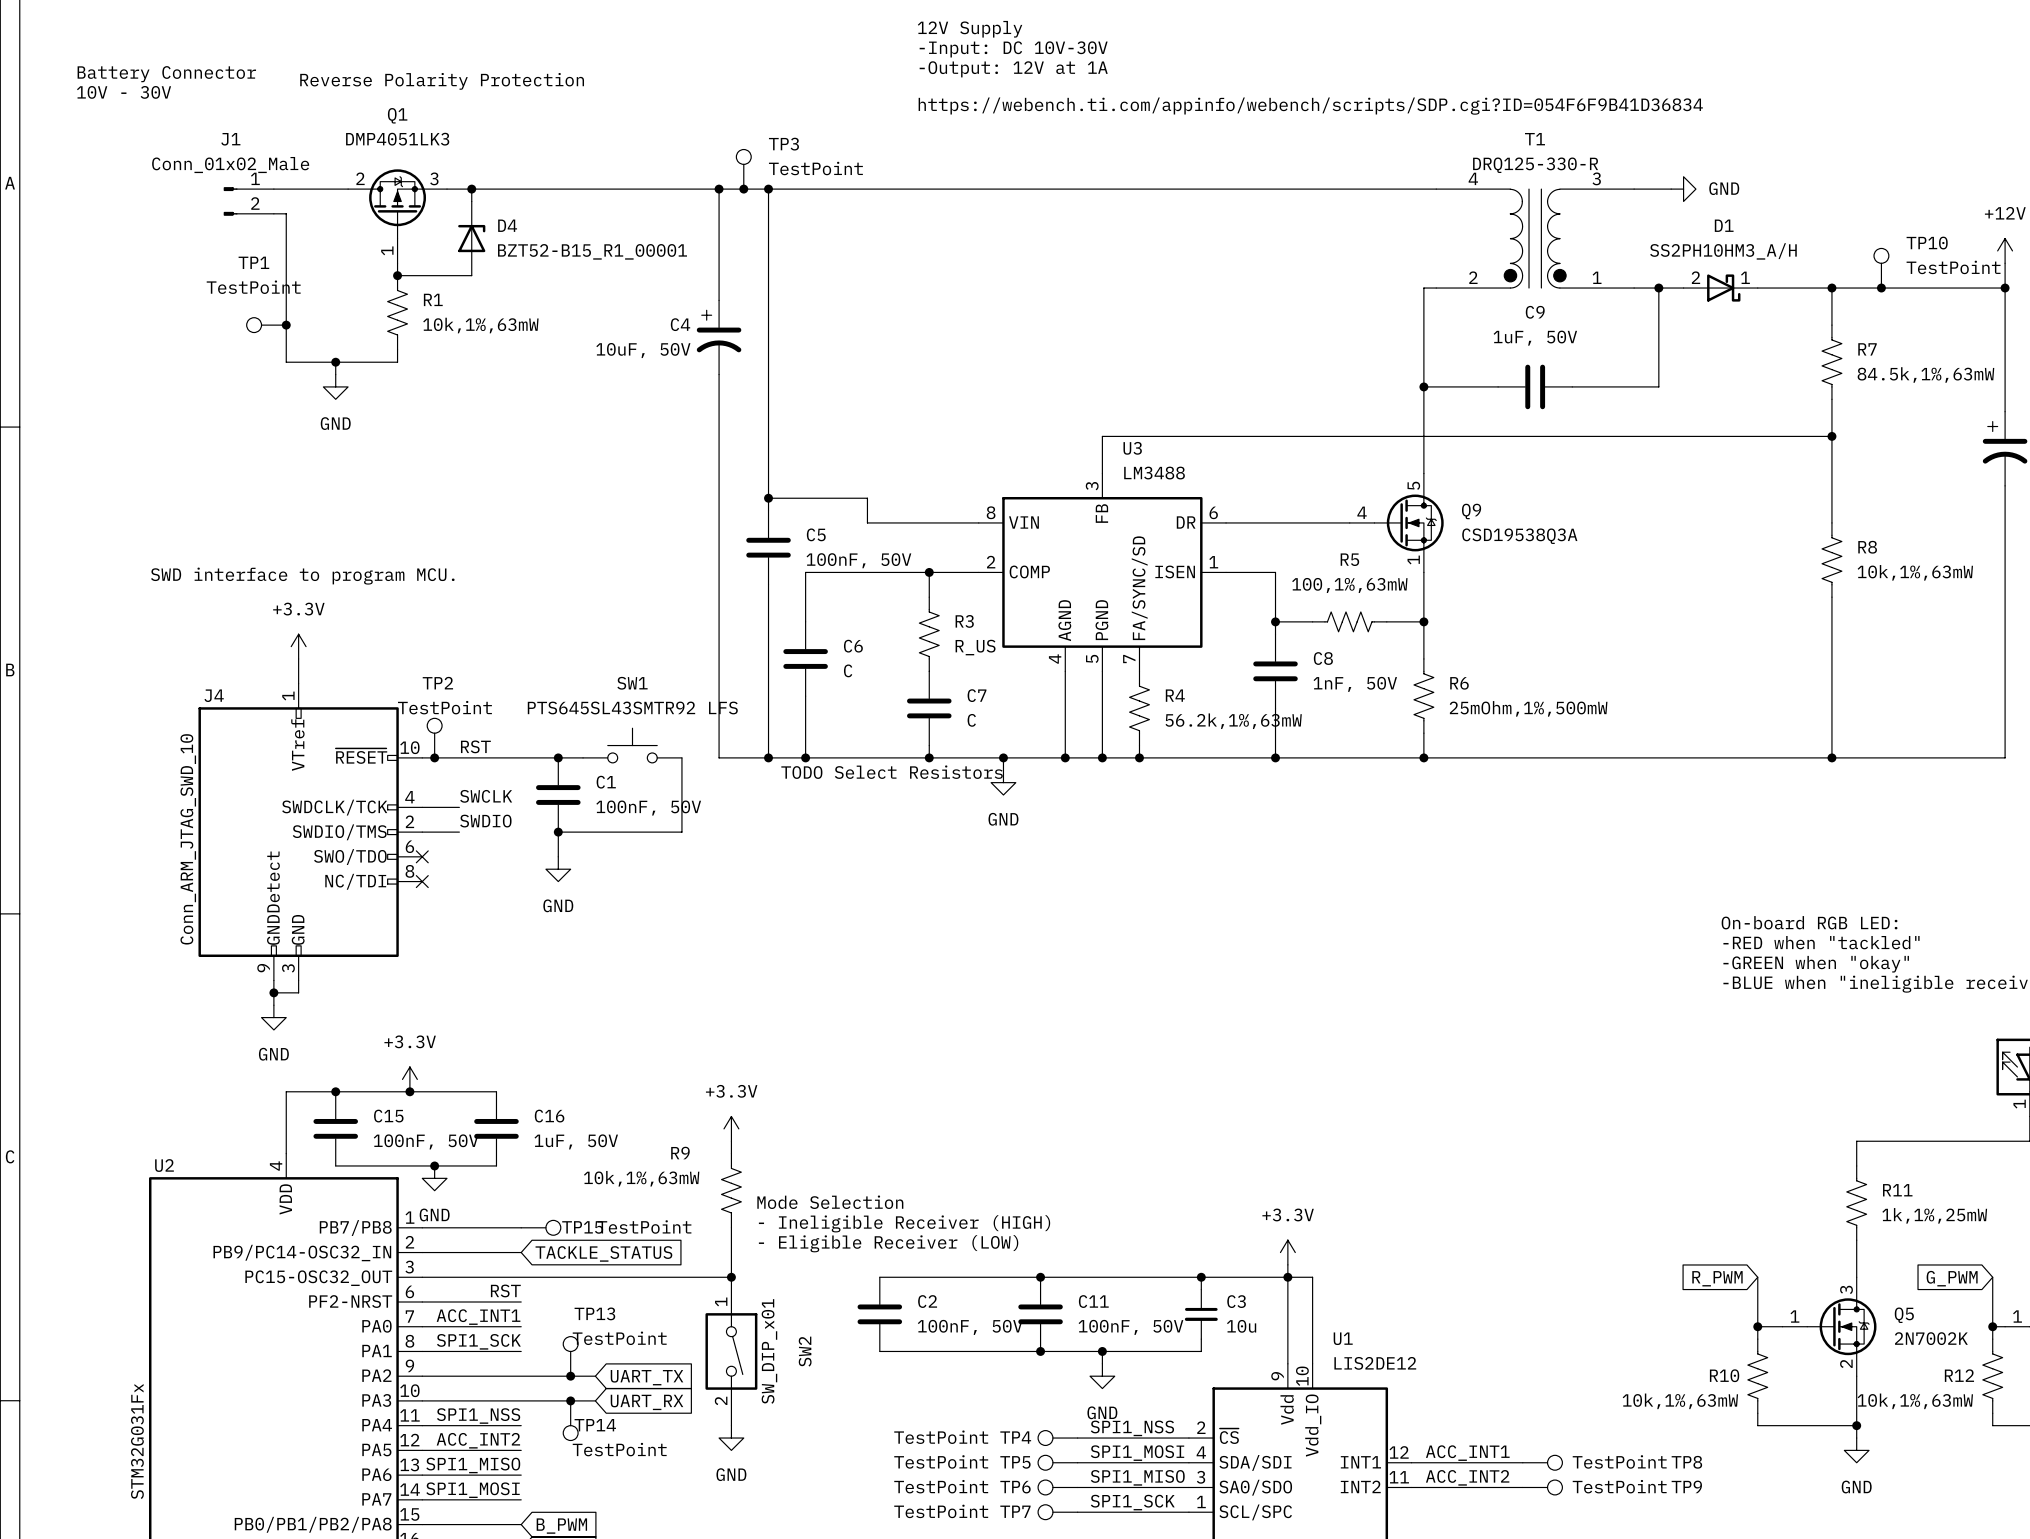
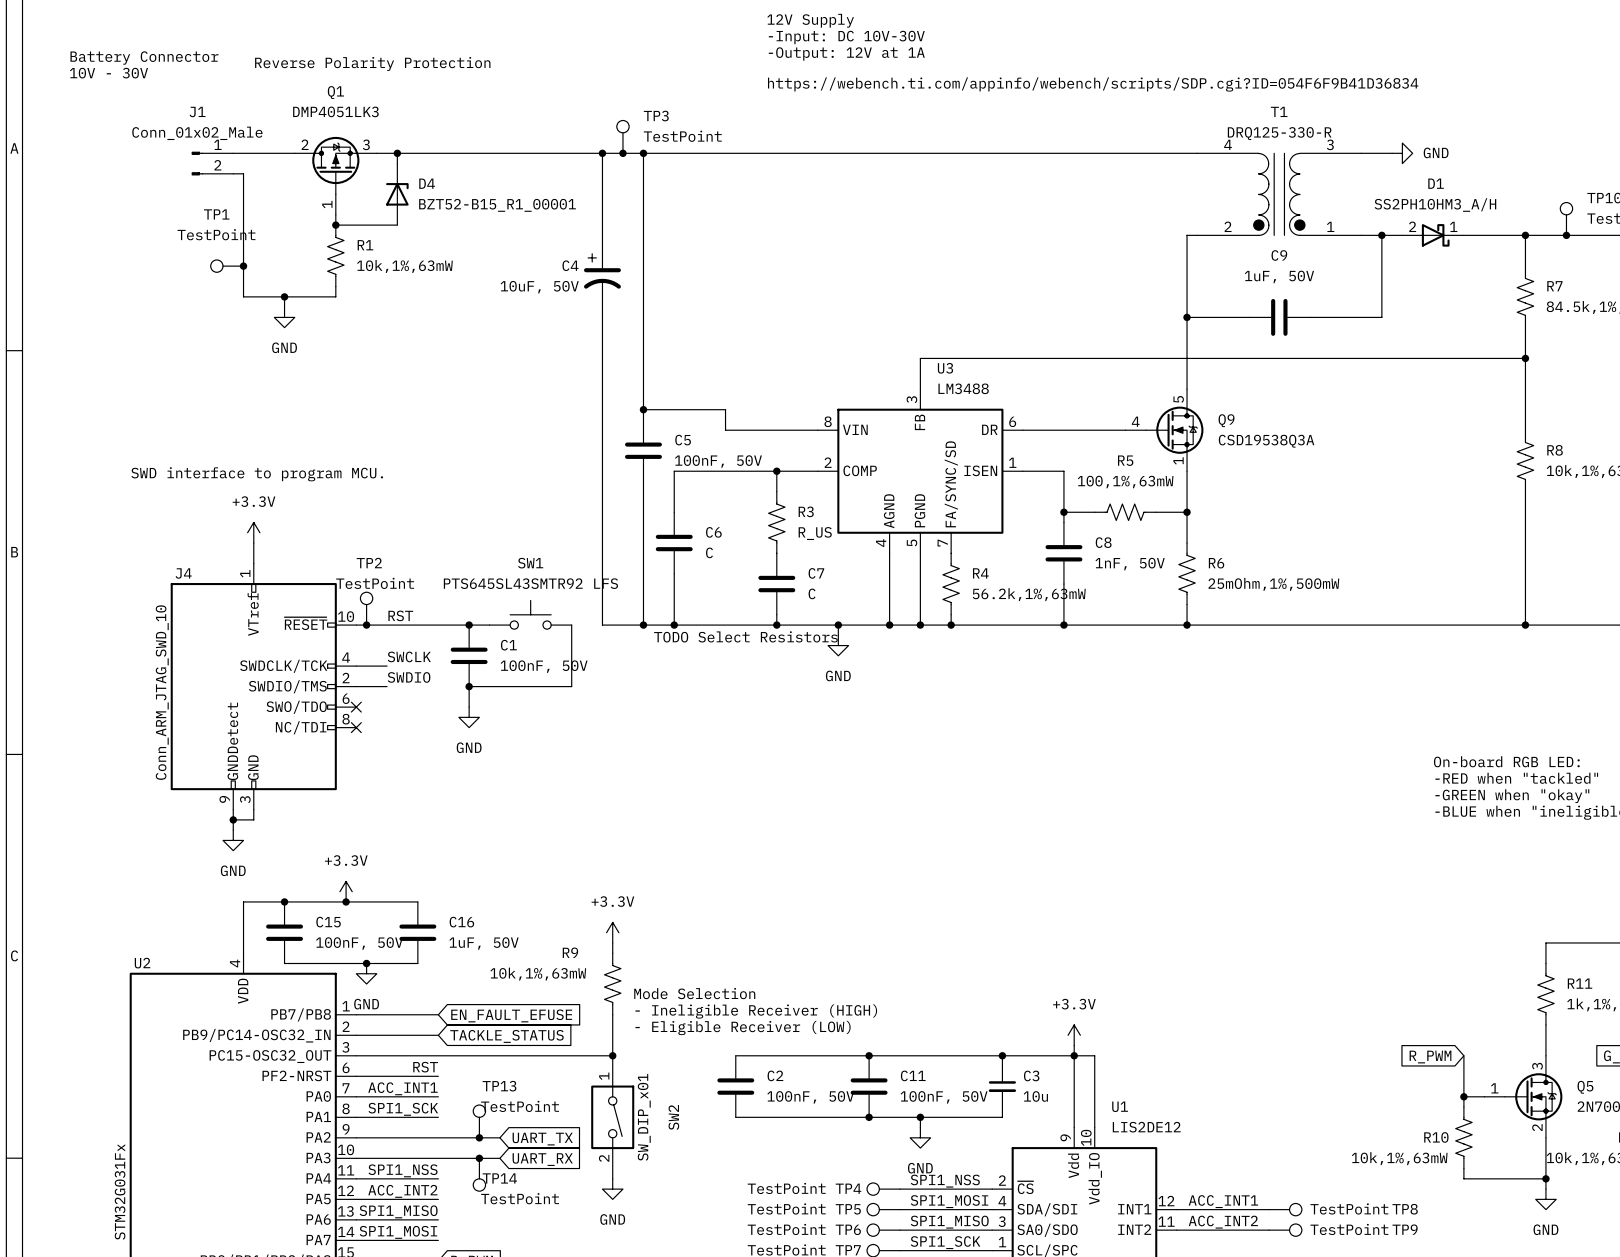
TP15: TestPoint (540, 1227) -> none
global label: none -> EN_FAULT_EFUSE (511, 1015)

